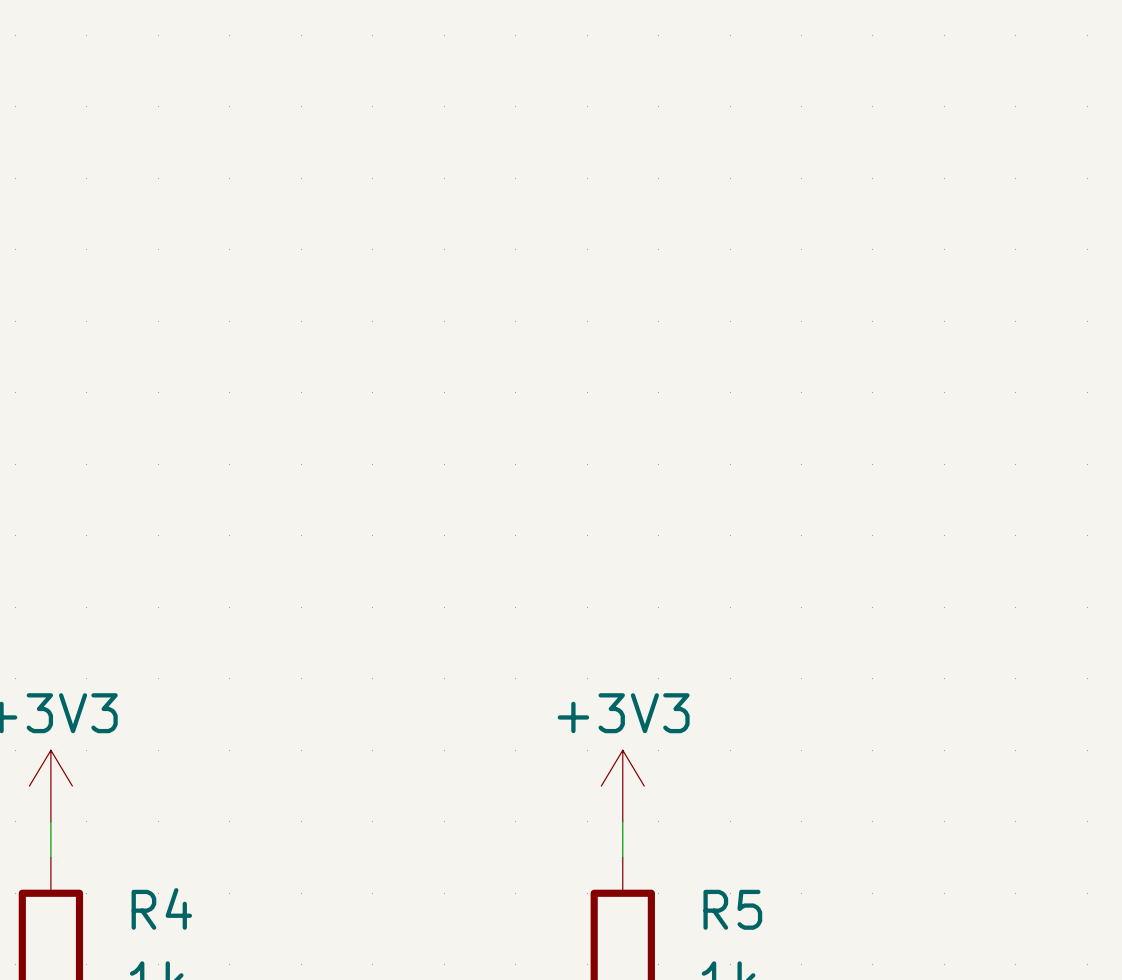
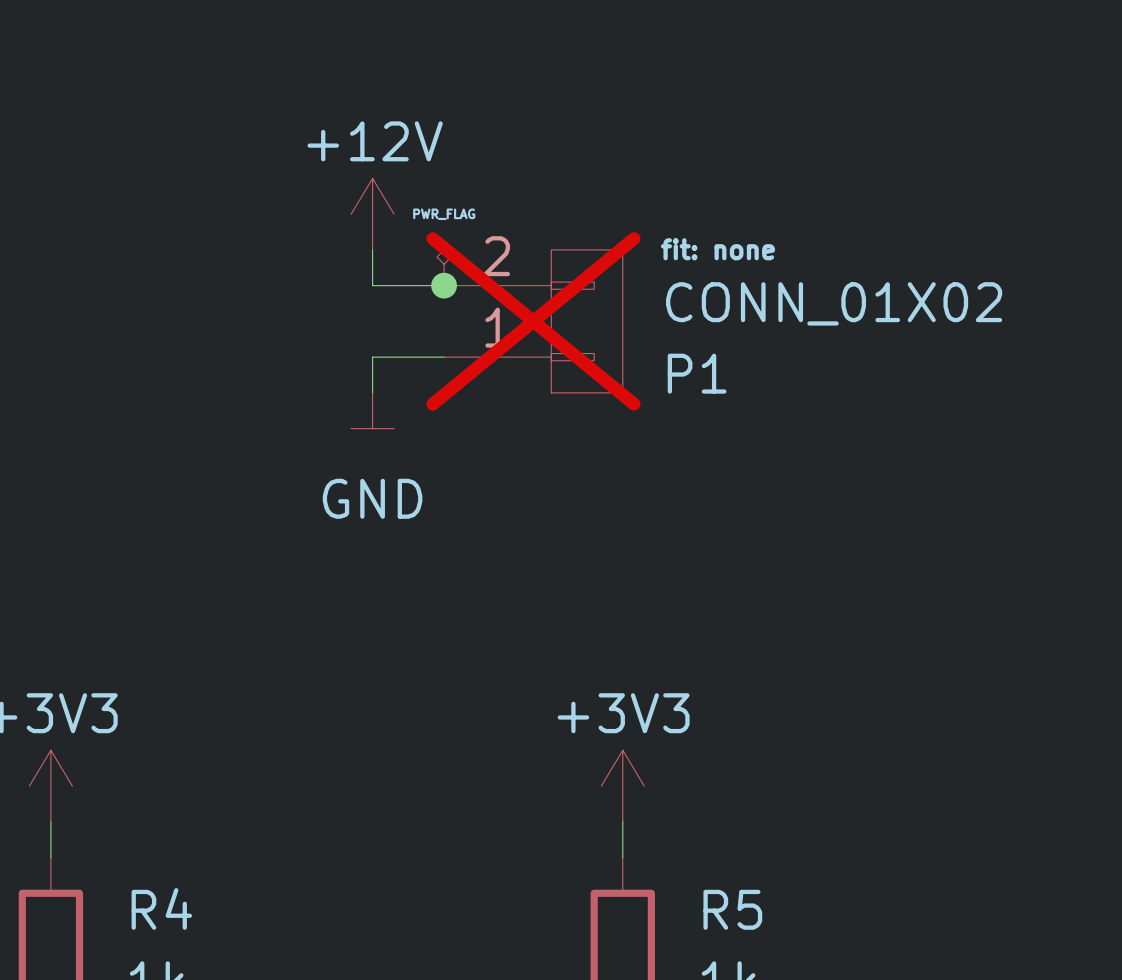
power symbol: none -> +12V (372, 214)
wire: none -> (372, 249) (372, 285) (444, 285)
power symbol: none -> PWR_FLAG (444, 267)
junction: none -> (444, 285)
P1: none -> CONN_01X02 (533, 321)
wire: none -> (444, 357) (372, 357) (372, 392)
power symbol: none -> GND (372, 410)

